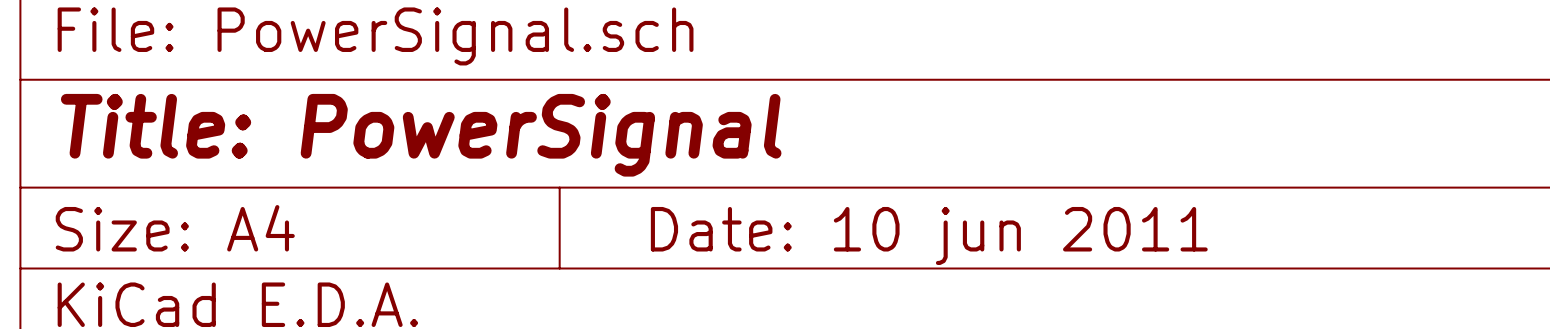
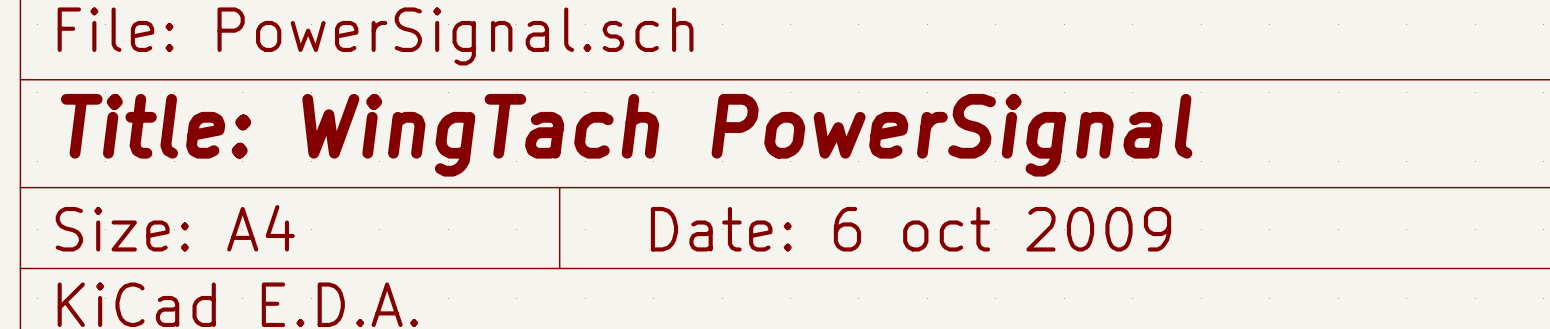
title block: Title: PowerSignal (421, 135) -> Title: WingTach PowerSignal (626, 135)
title block: Date: 10 jun 2011 (929, 235) -> Date: 6 oct 2009 (910, 229)

